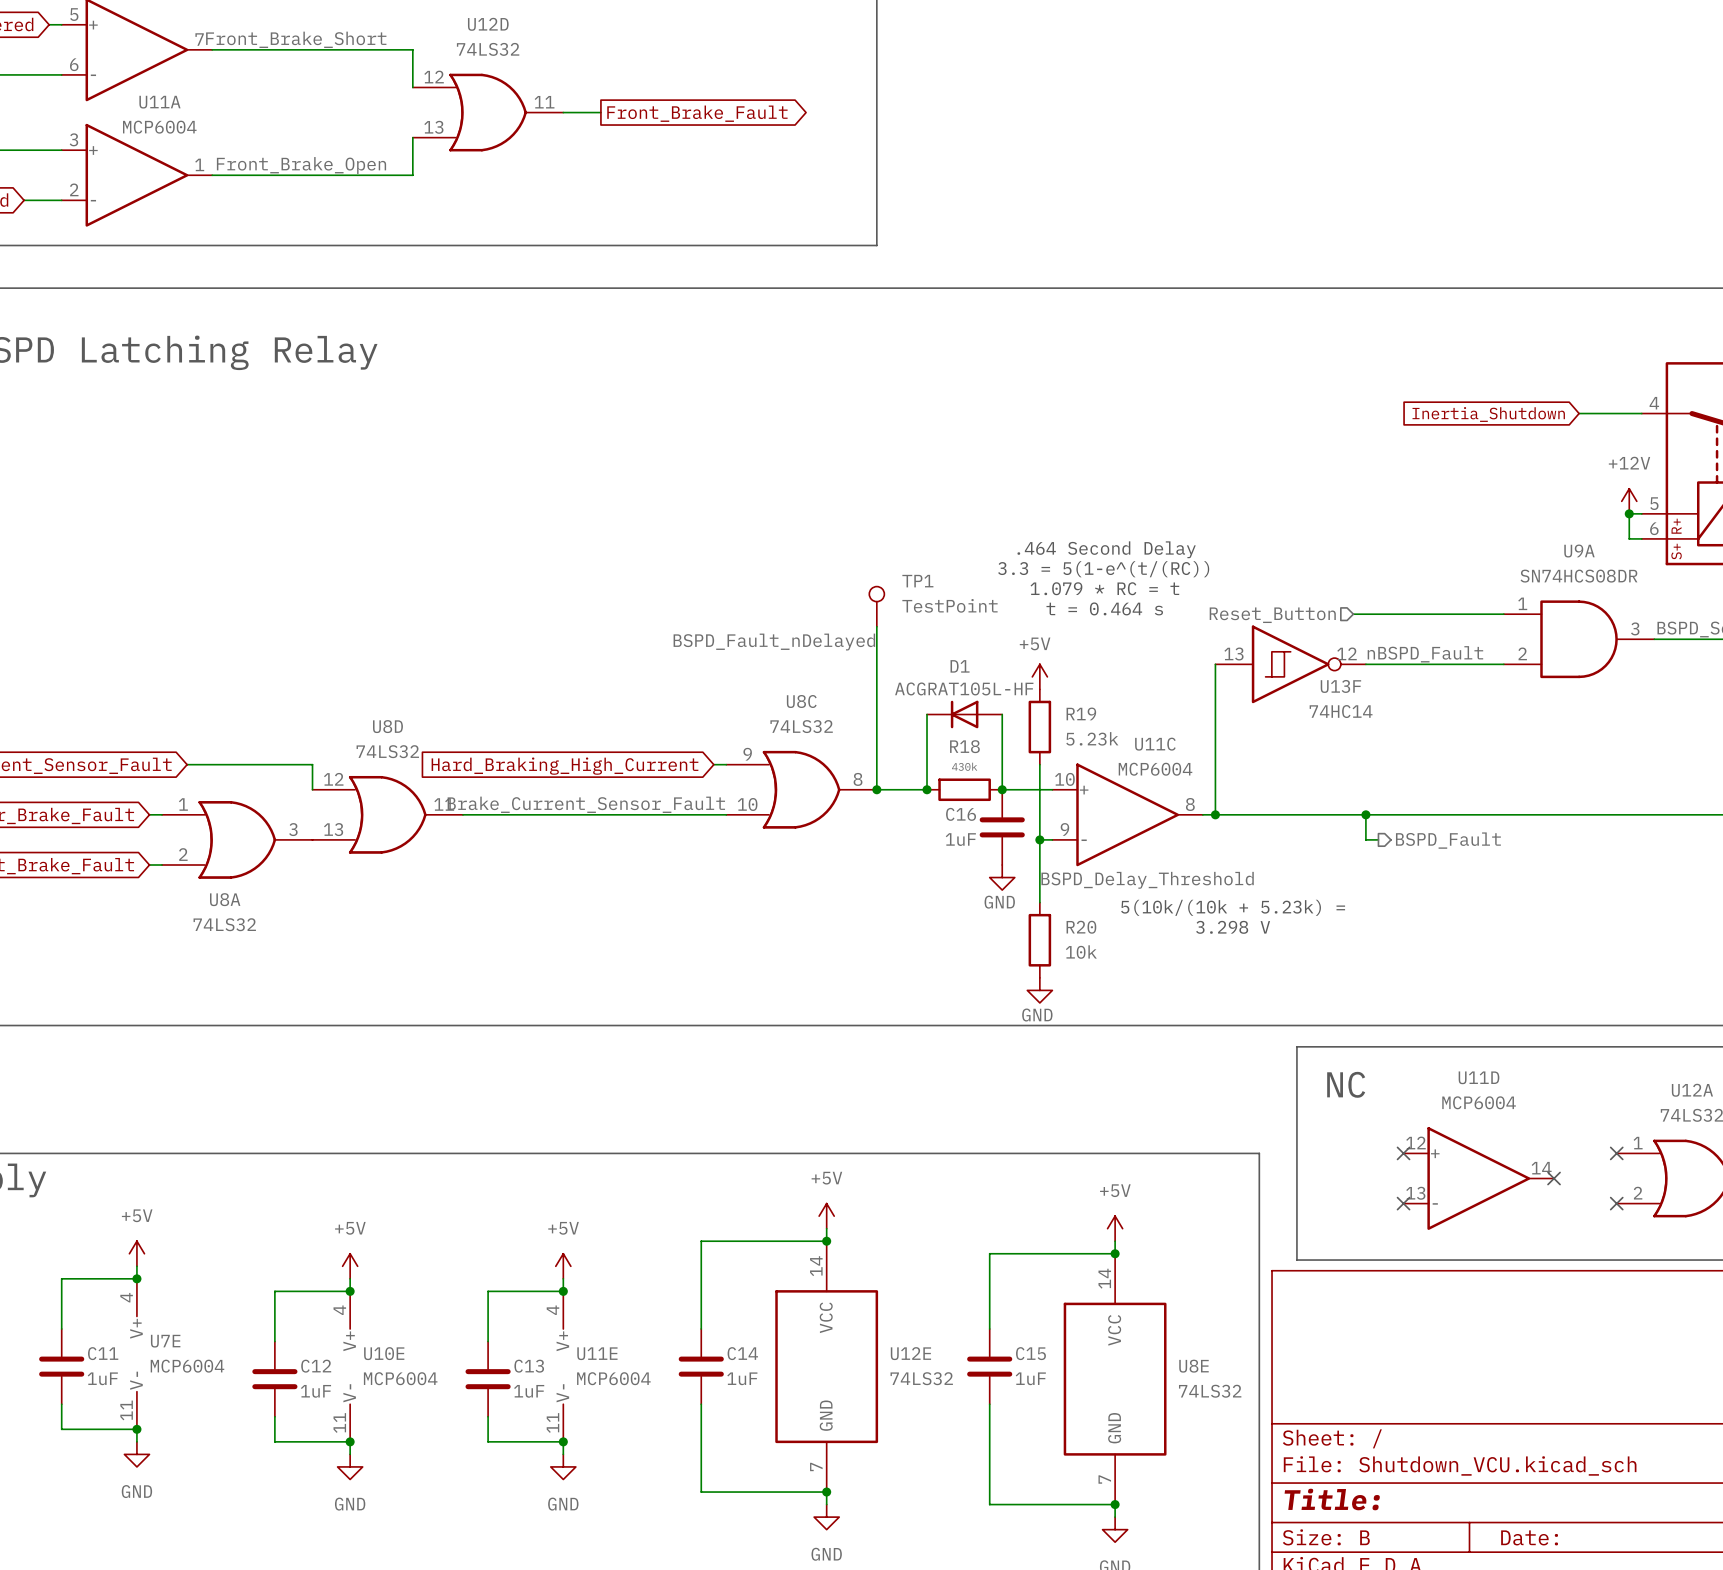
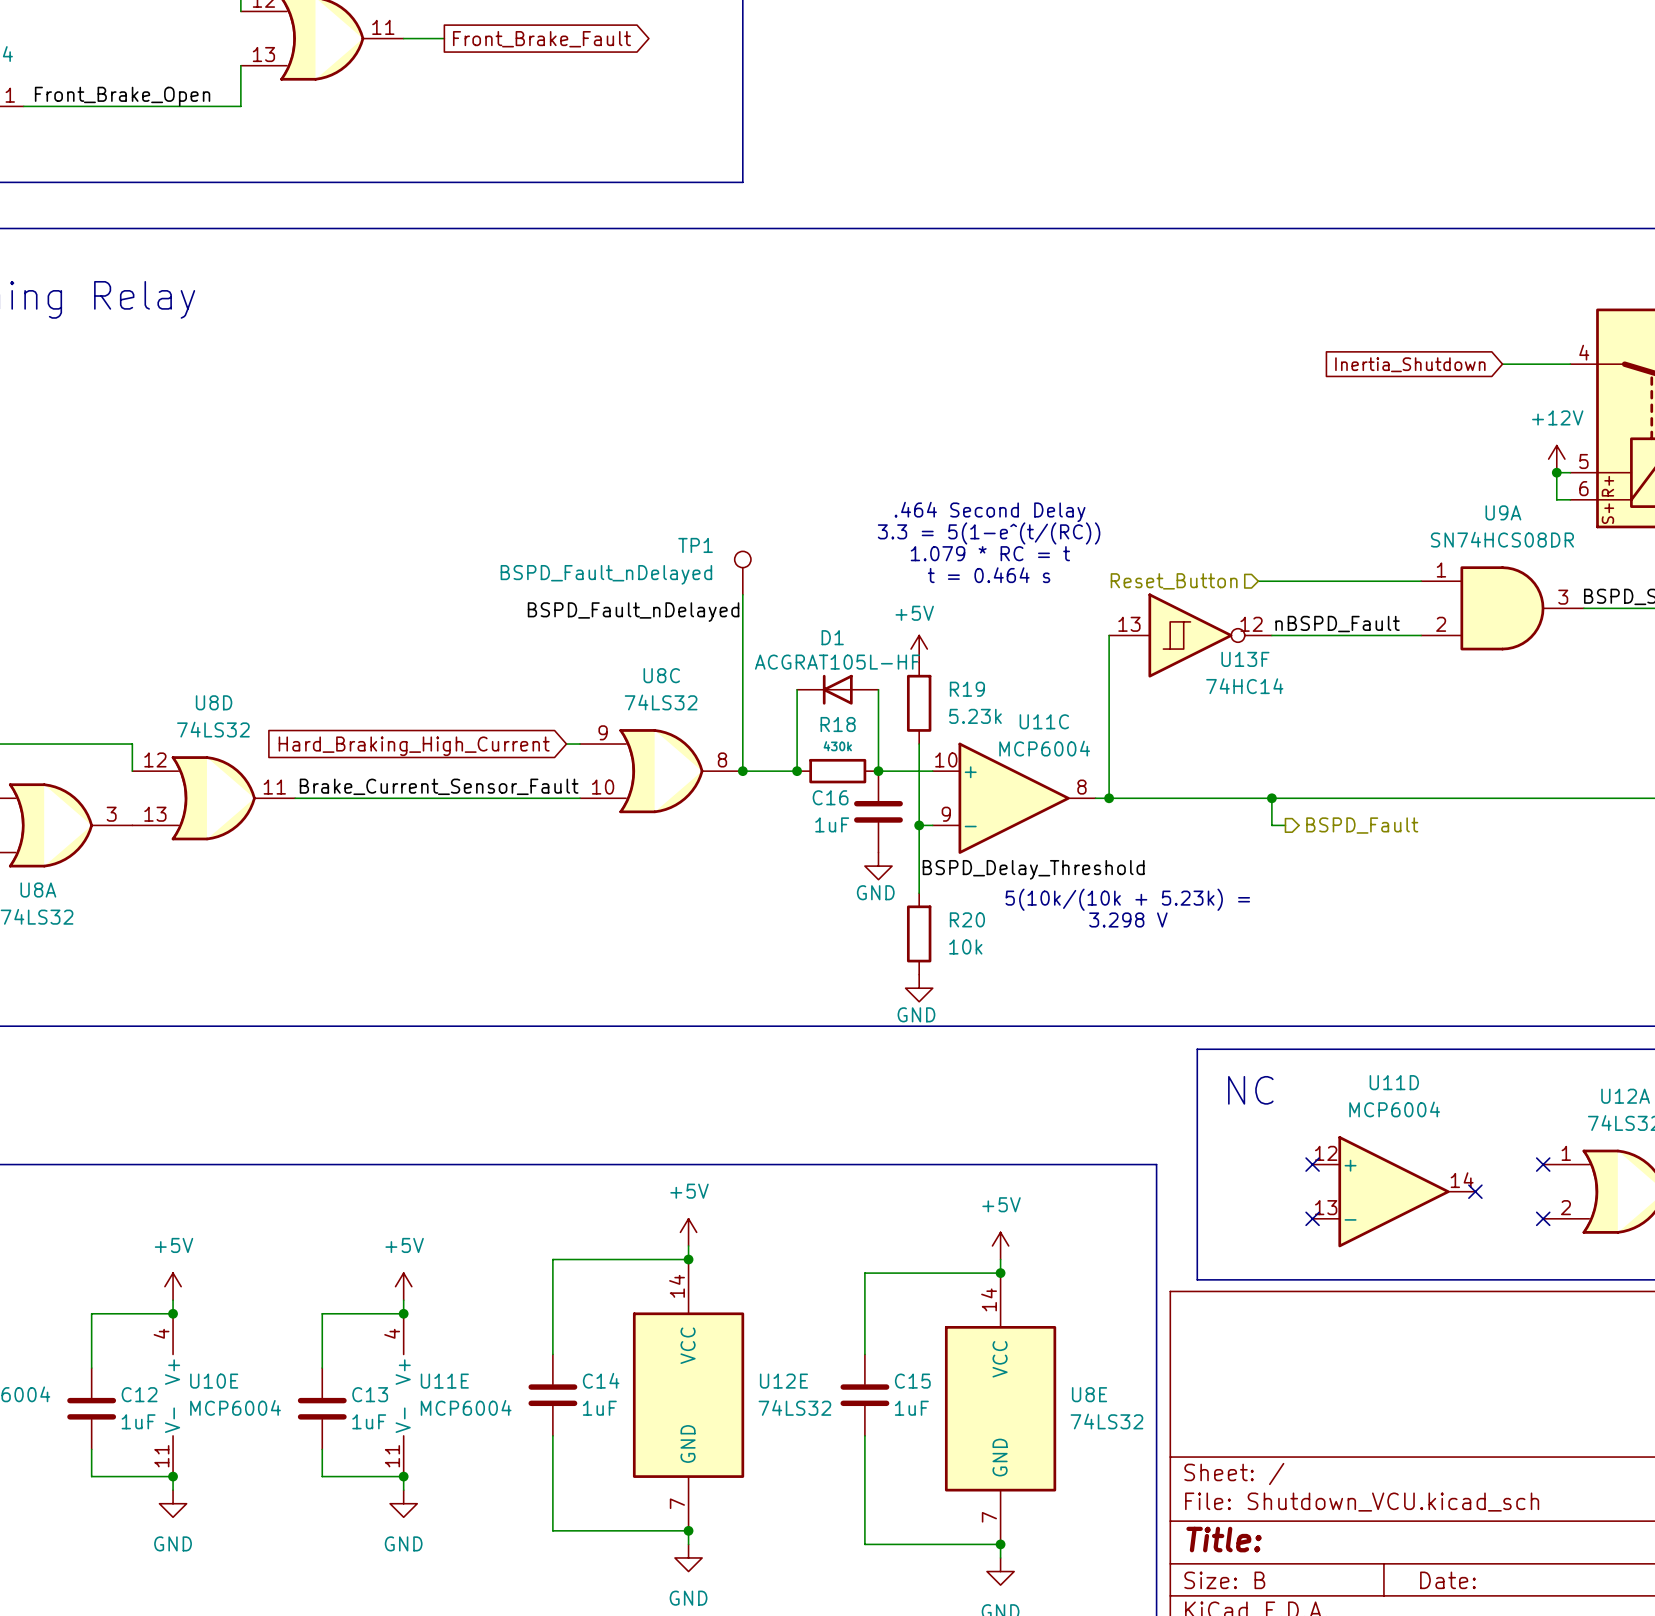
TP1 name position: TP1 (917, 581) -> TP1 (695, 545)
TP1 value: TestPoint (949, 605) -> BSPD_Fault_nDelayed (606, 574)

